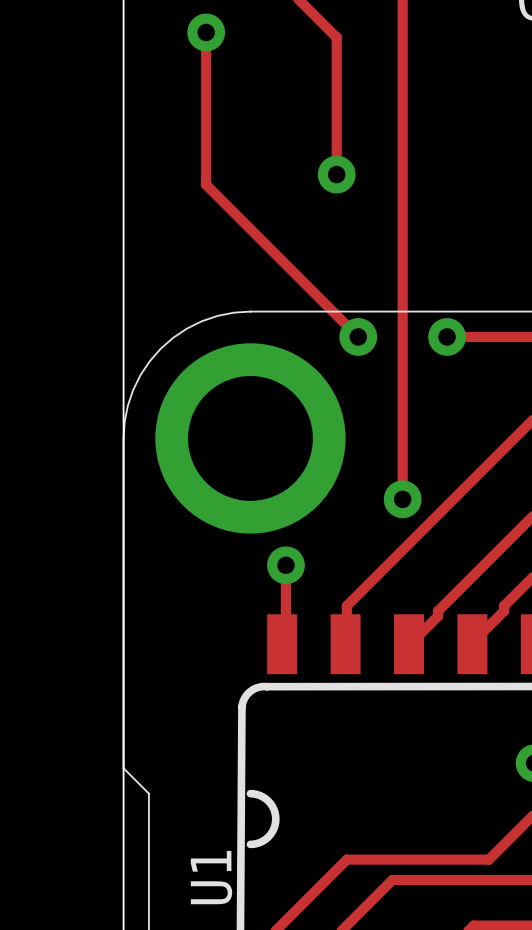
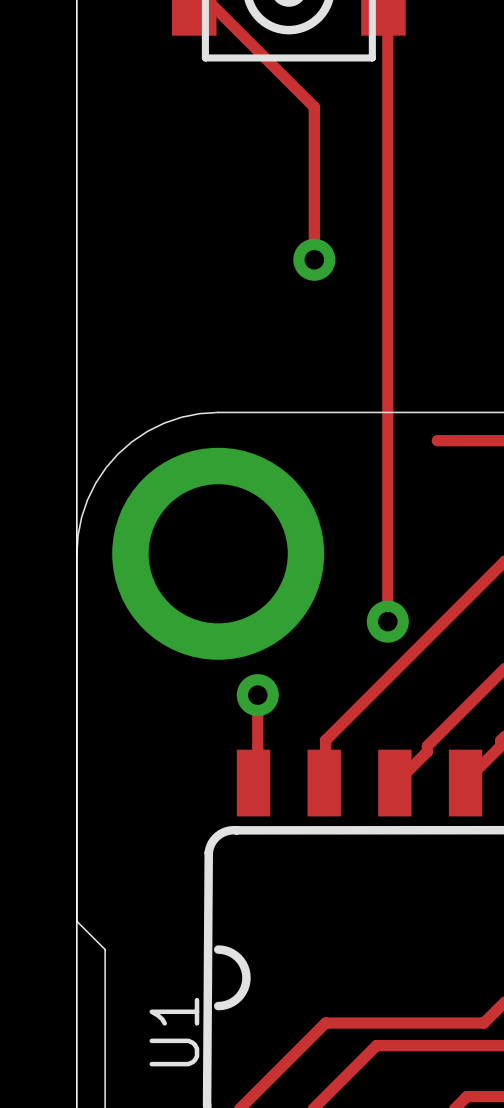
track: (206, 32) (206, 184) (358, 336) -> none
via: (206, 32) -> none
via: (358, 336) -> none
via: (447, 336) -> none

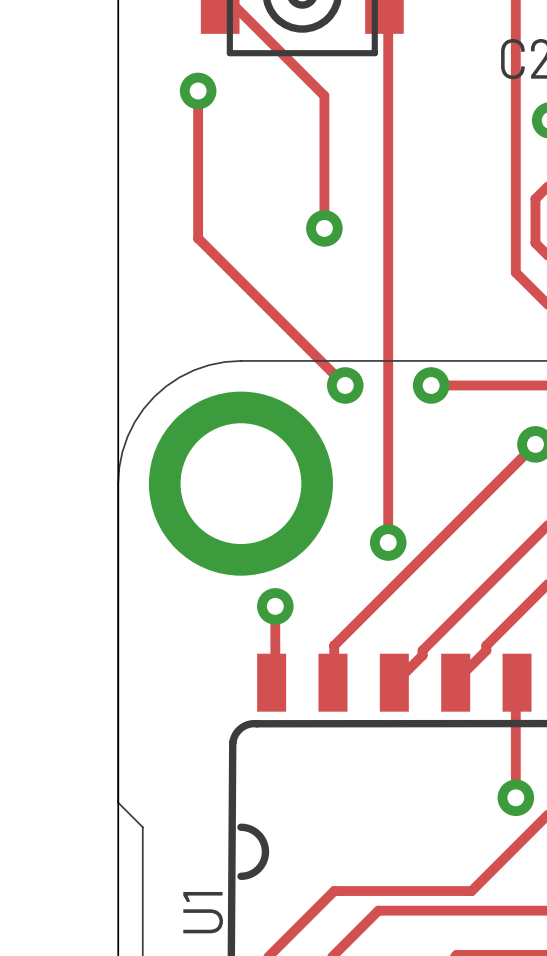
track: none -> (198, 90) (198, 238) (345, 385)
via: none -> (198, 90)
via: none -> (345, 385)
via: none -> (431, 385)

